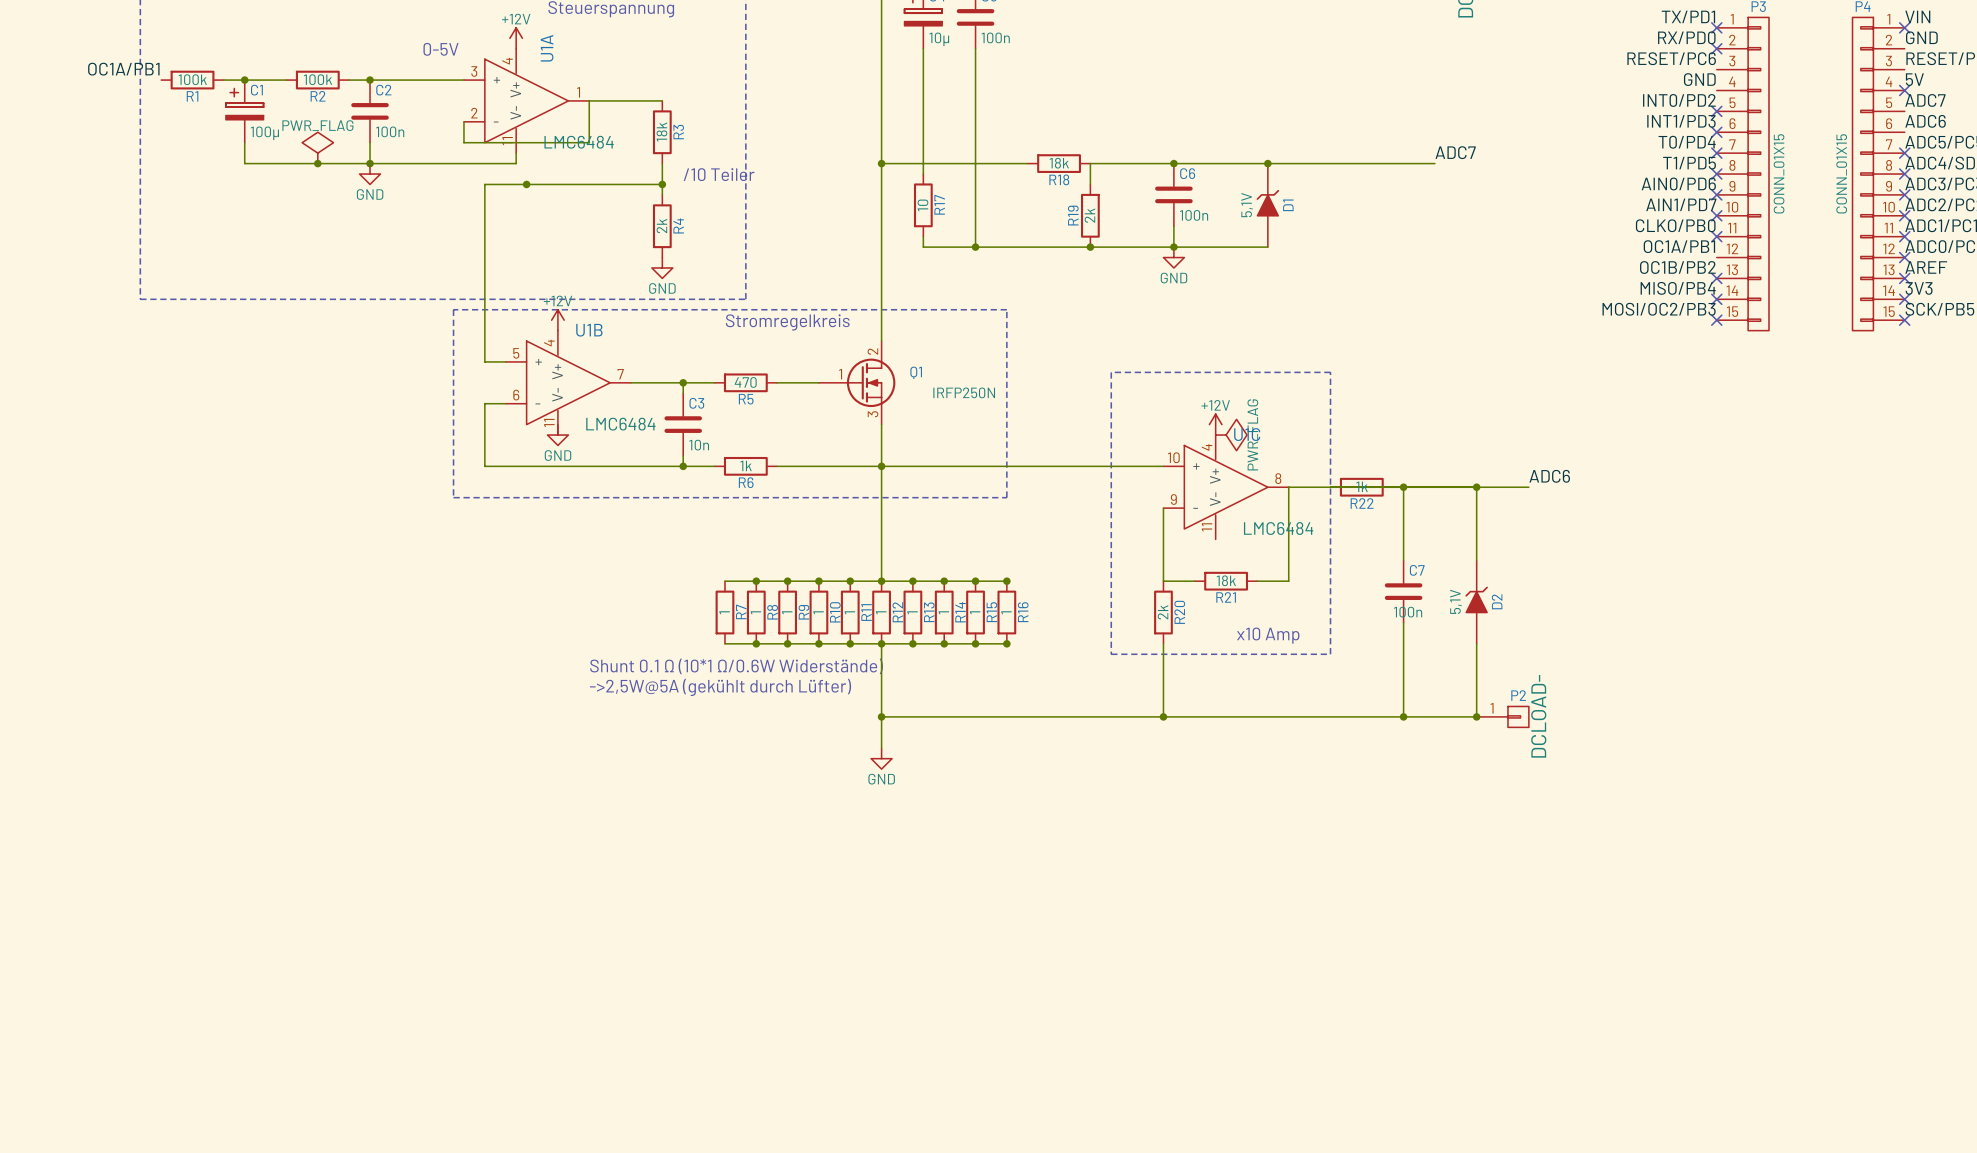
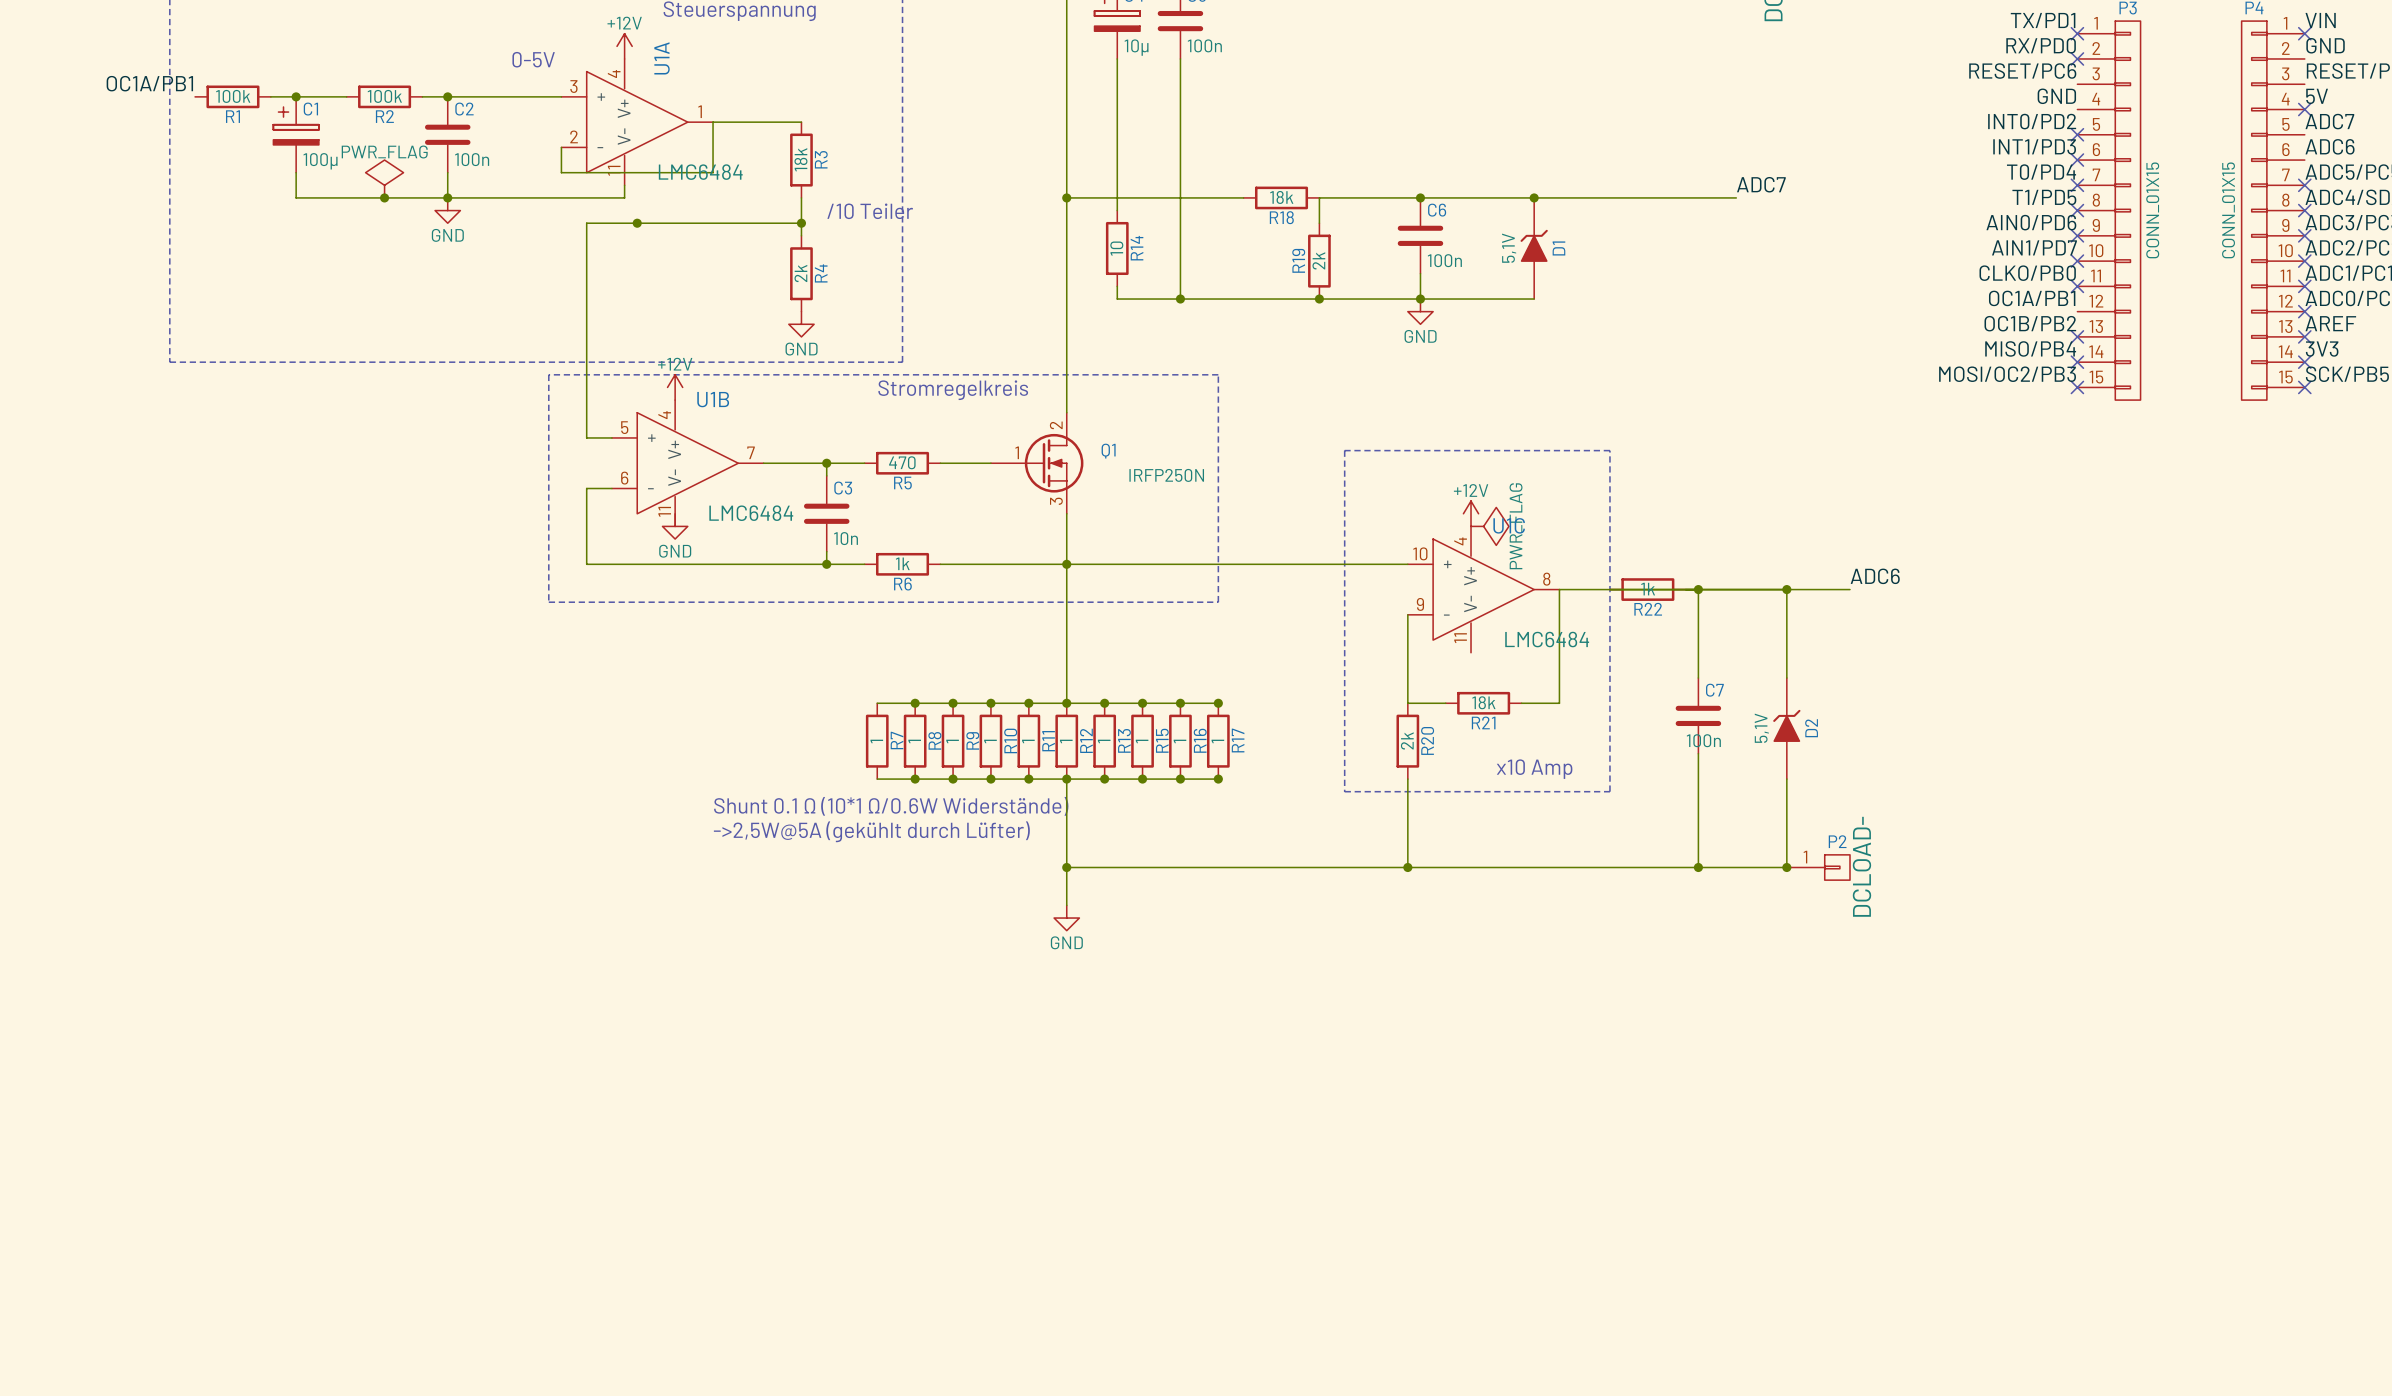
R17 name: R17 (939, 204) -> R14 (1137, 248)
R14 name: R14 (960, 612) -> R15 (1162, 740)
R15 name: R15 (991, 612) -> R16 (1200, 740)
R16 name: R16 (1023, 612) -> R17 (1238, 740)

